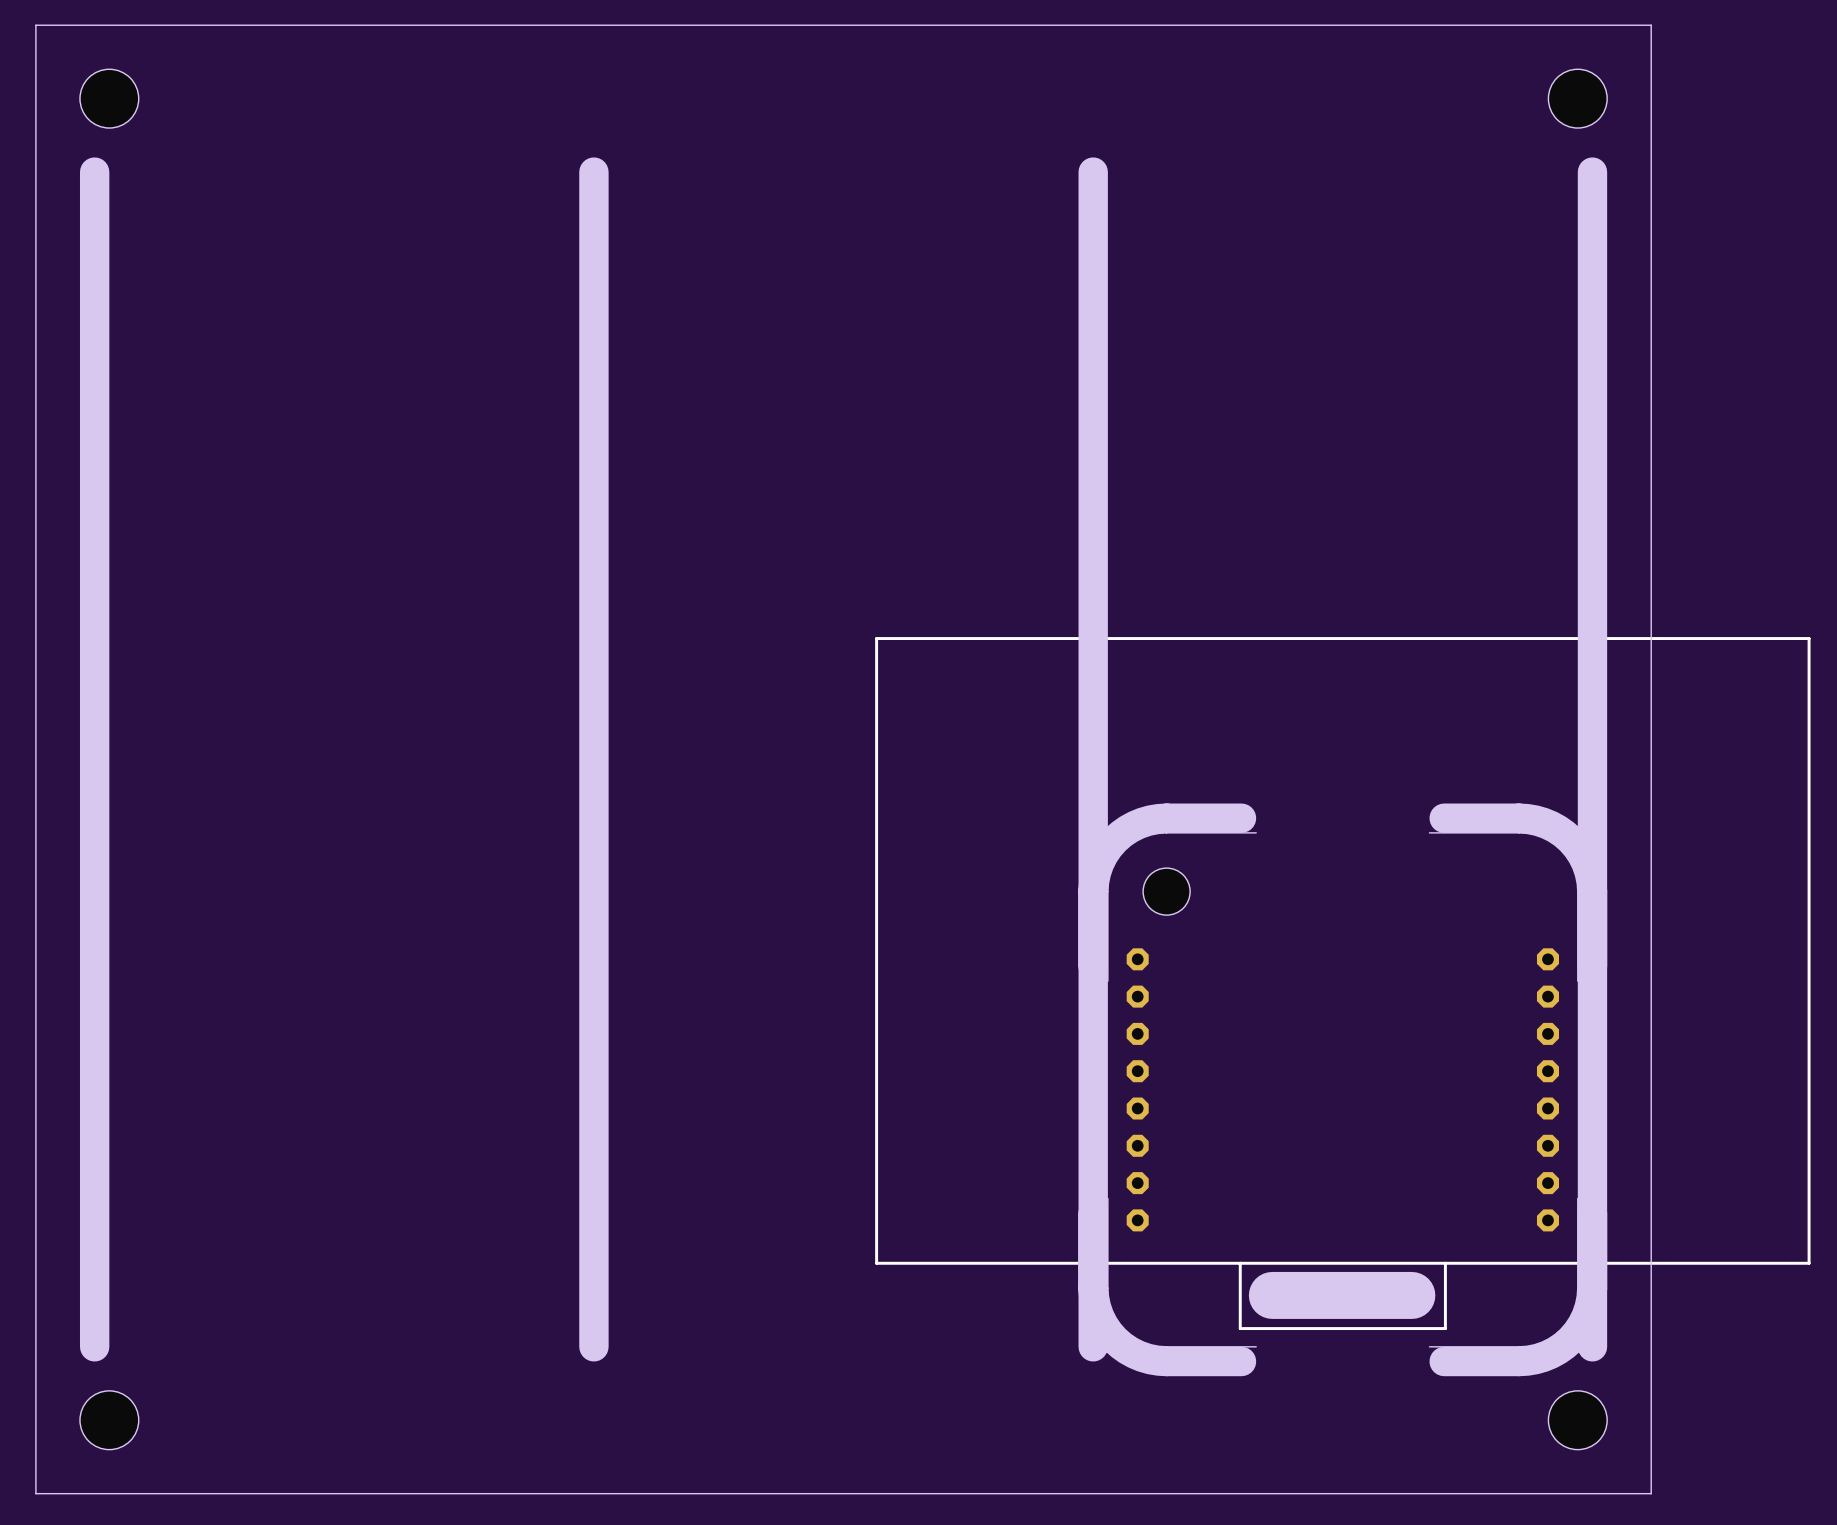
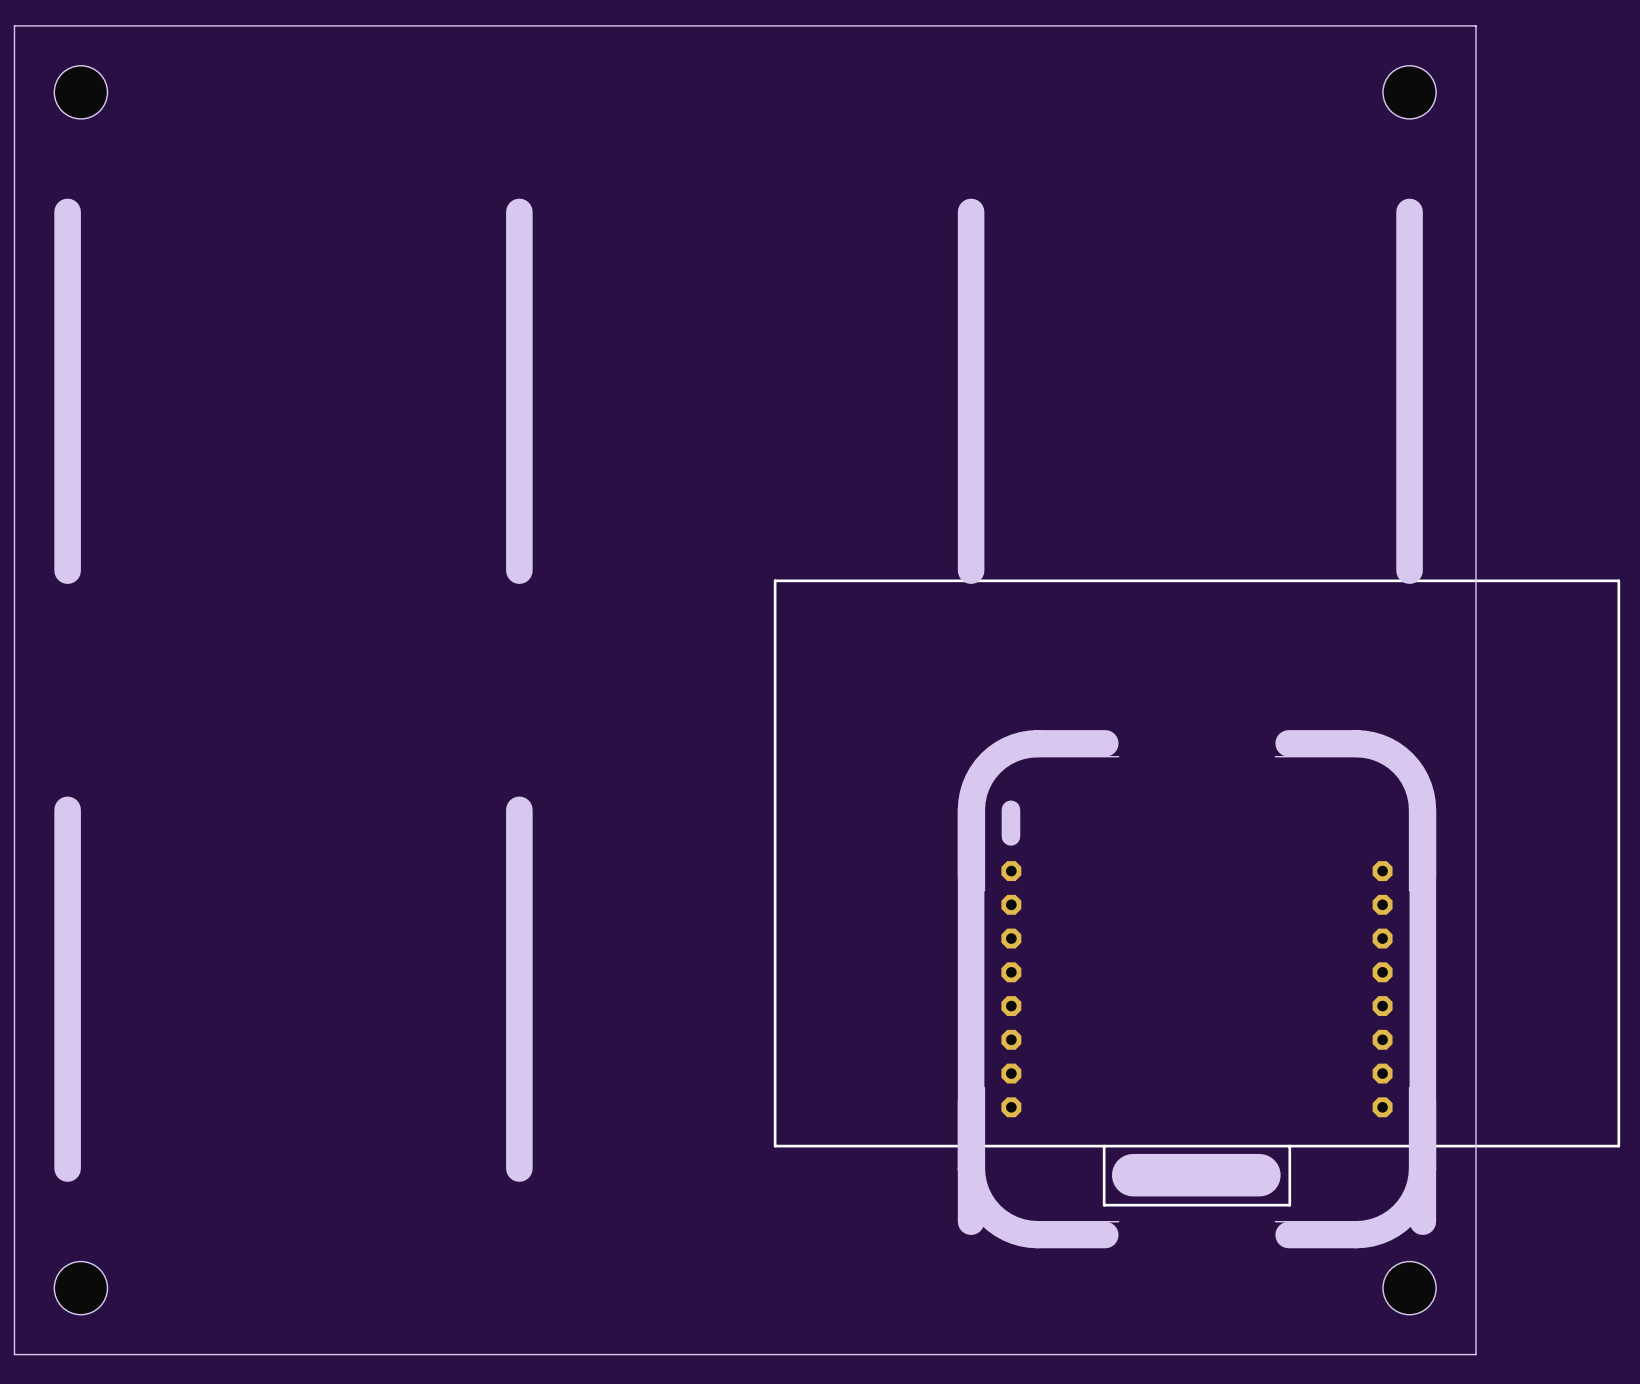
board edge: (94, 172) (94, 230) -> none
board edge: (593, 172) (593, 230) -> none
board edge: (1093, 172) (1093, 230) -> none
board edge: (1592, 172) (1592, 891) -> none
board edge: none -> (1409, 211) (1409, 570)
board edge: (94, 627) (94, 891) -> none
board edge: (593, 627) (593, 891) -> none
board edge: (1093, 627) (1093, 891) -> none
drawing: none -> [957, 730, 1119, 891]
board edge: none -> (1010, 809) (1010, 836)
part: (1167, 892) -> none
board edge: (94, 1288) (94, 1346) -> none
board edge: (593, 1288) (593, 1346) -> none

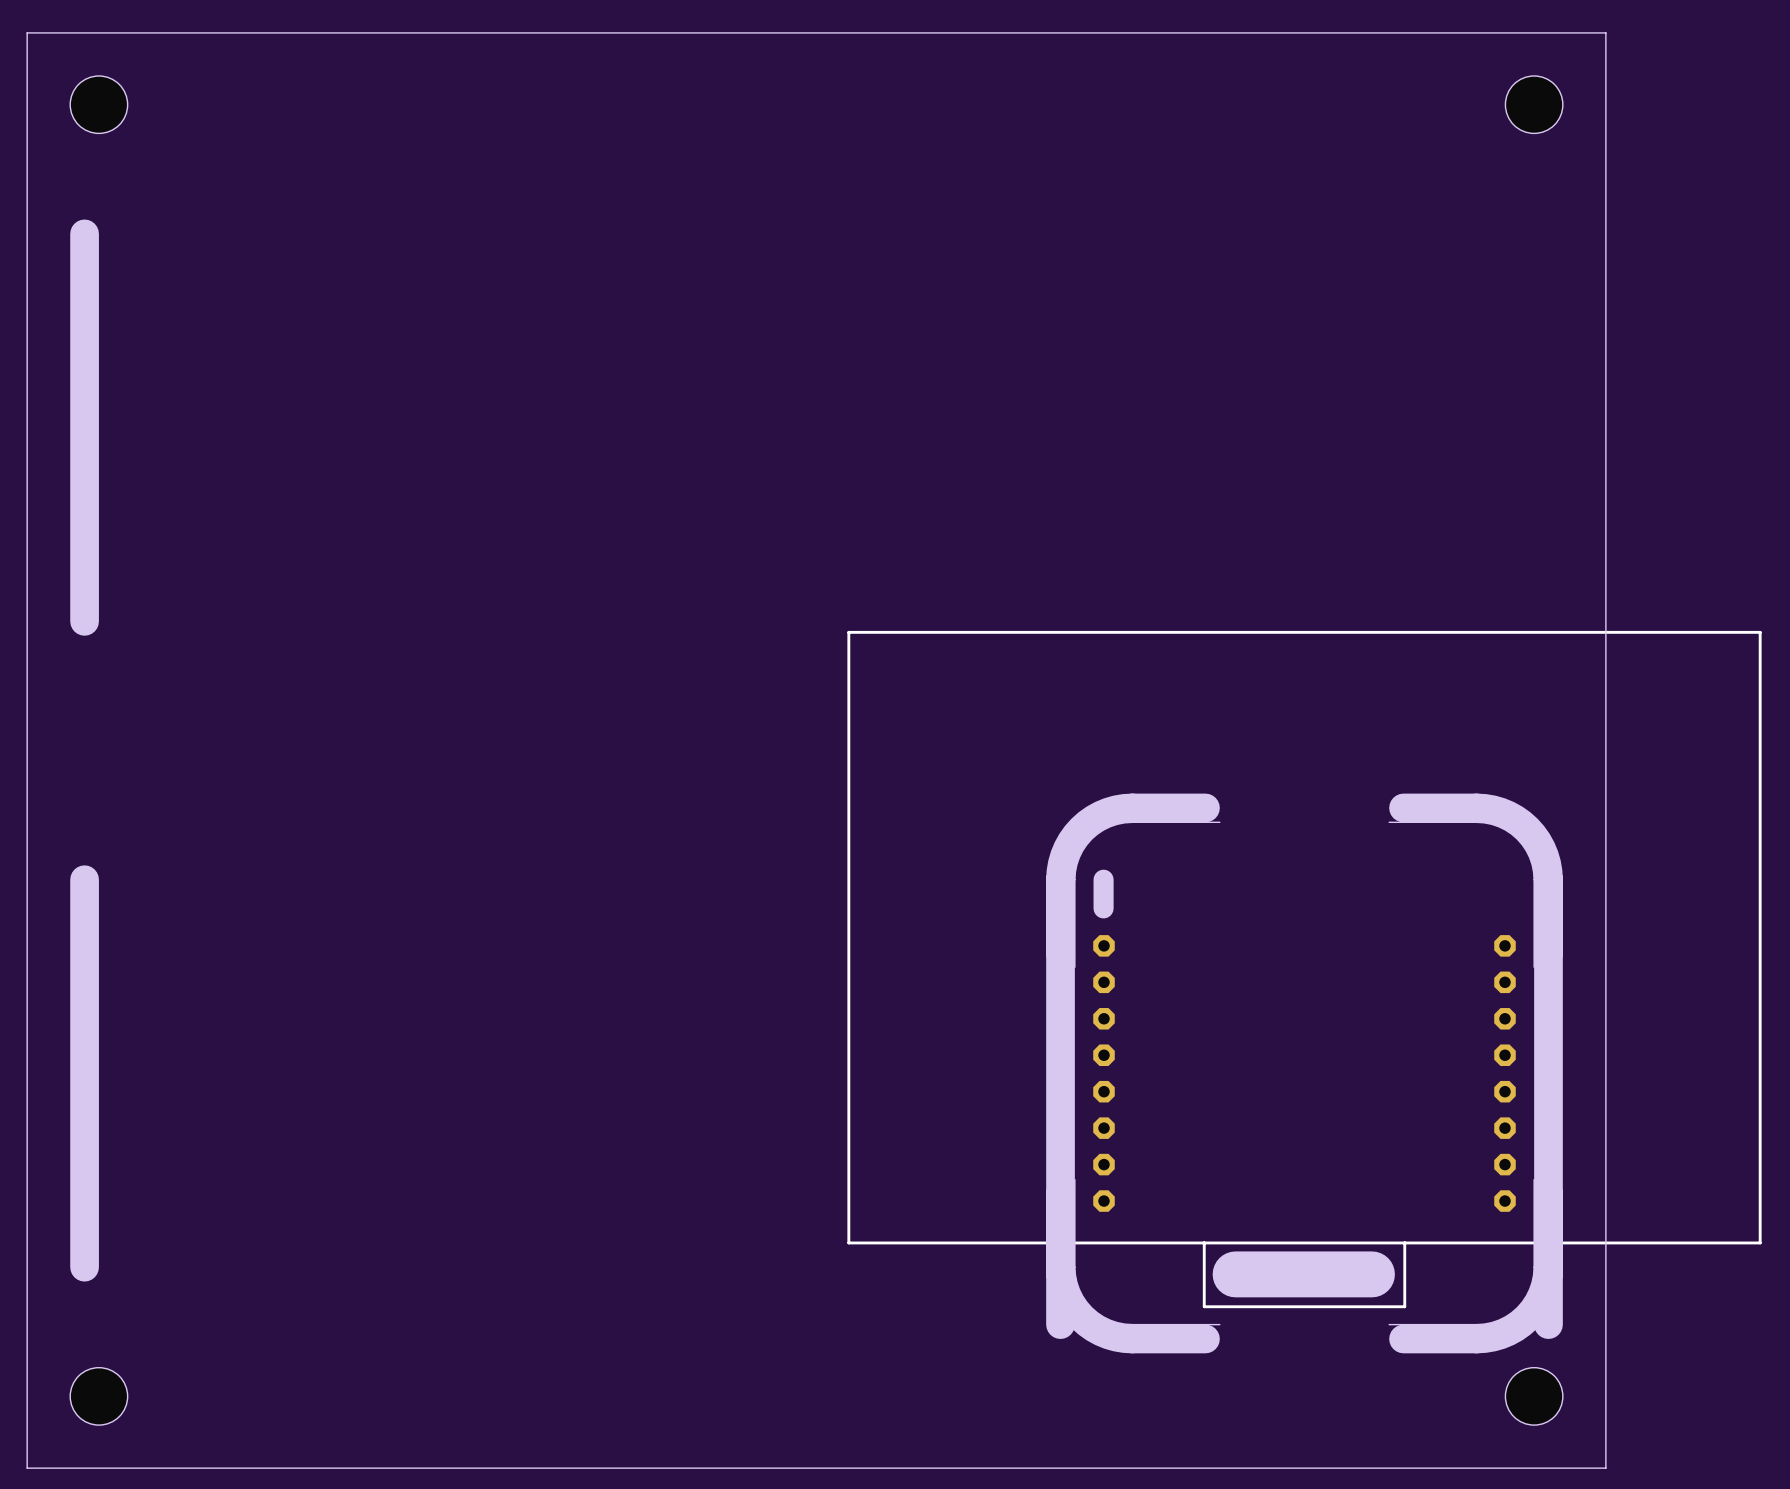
board edge: (519, 211) (519, 570) -> none
board edge: (971, 211) (971, 570) -> none
board edge: (1409, 211) (1409, 570) -> none
board edge: (519, 809) (519, 1168) -> none

